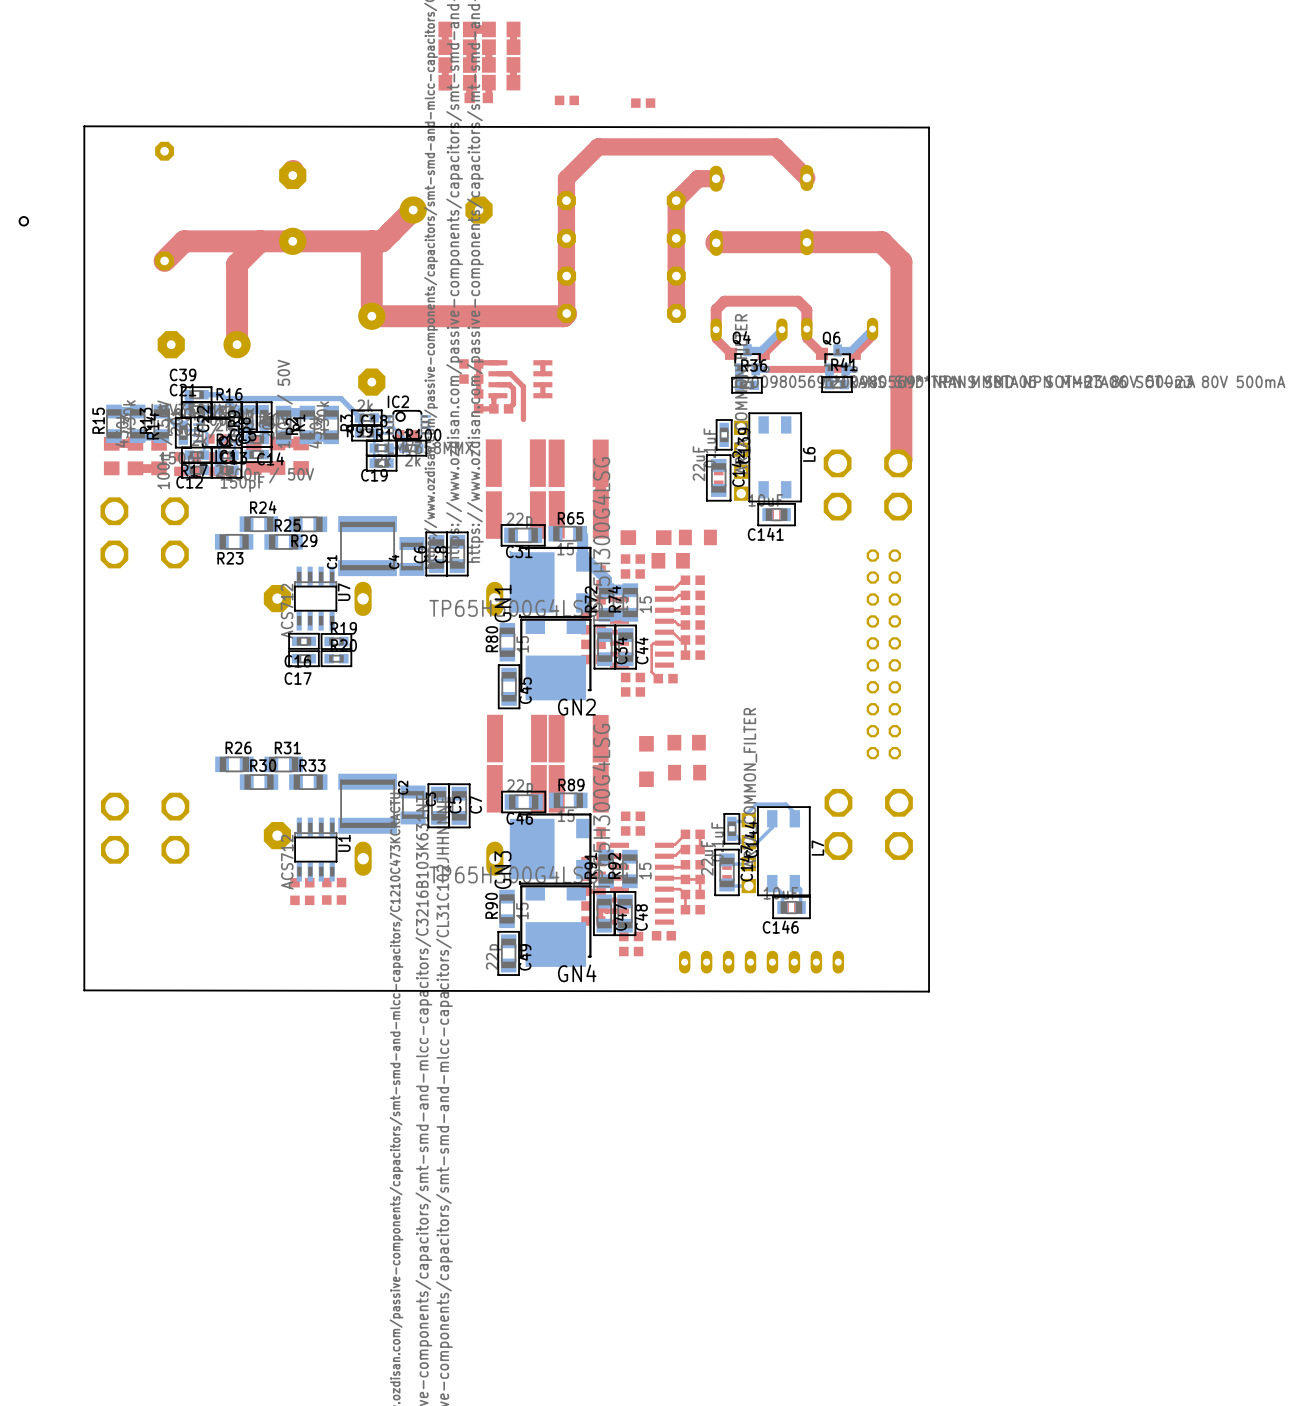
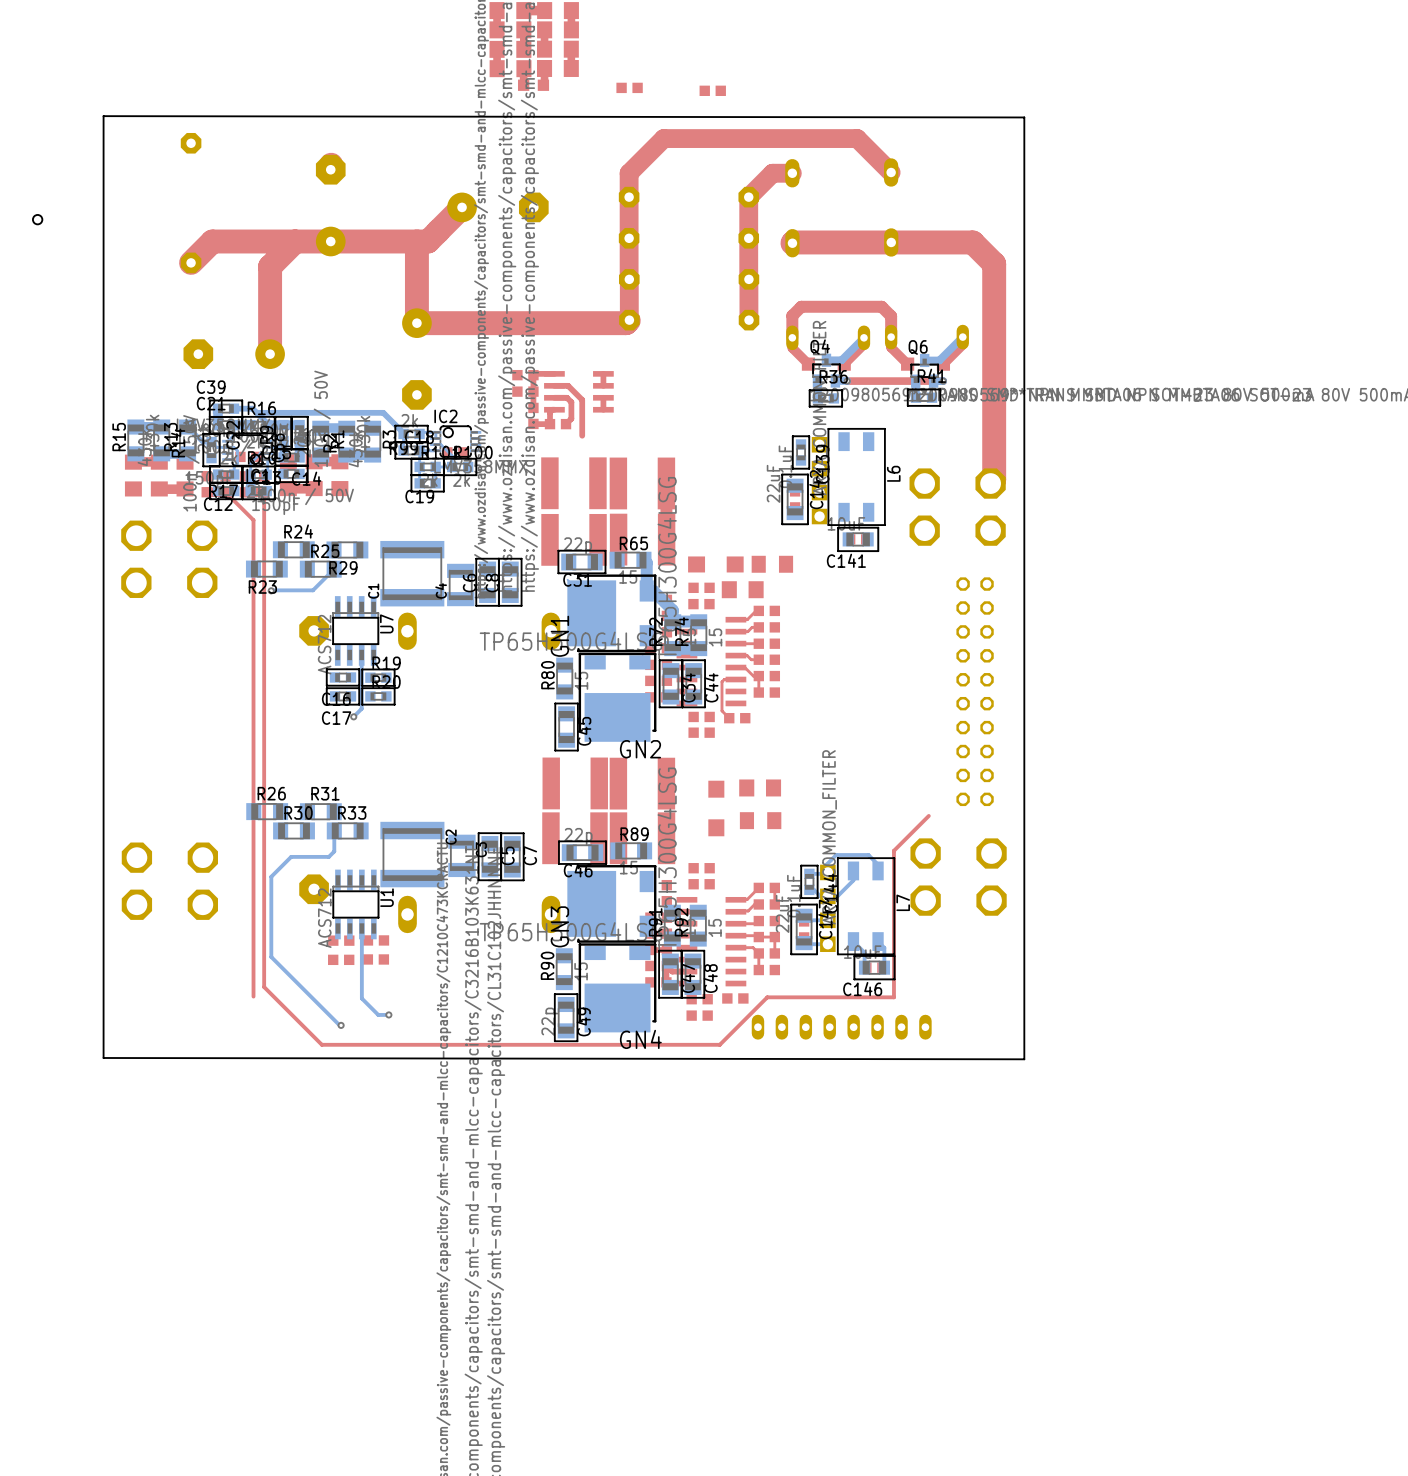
top track: none -> (225, 492) (253, 520) (253, 996)
top track: none -> (264, 492) (264, 987) (321, 1044) (719, 1044) (767, 997) (893, 997) (893, 850) (928, 815)
bottom track: none -> (334, 569) (312, 590) (271, 590)
via: none -> (271, 590)
bottom track: none -> (361, 655) (361, 708) (353, 716)
via: none -> (353, 716)
bottom track: none -> (334, 830) (334, 851) (328, 856) (291, 856) (271, 876) (271, 957) (341, 1025)
bottom track: none -> (361, 928) (361, 998) (378, 1014) (388, 1014)
via: none -> (388, 1014)
via: none -> (341, 1025)

